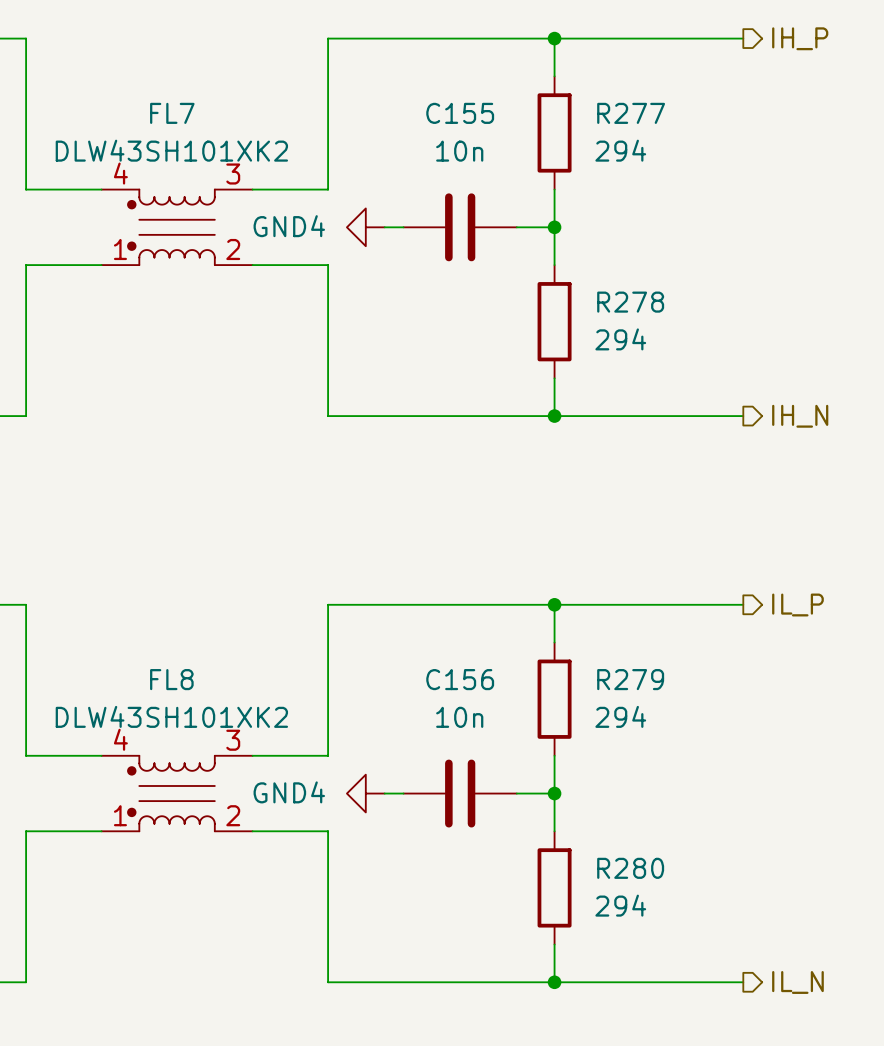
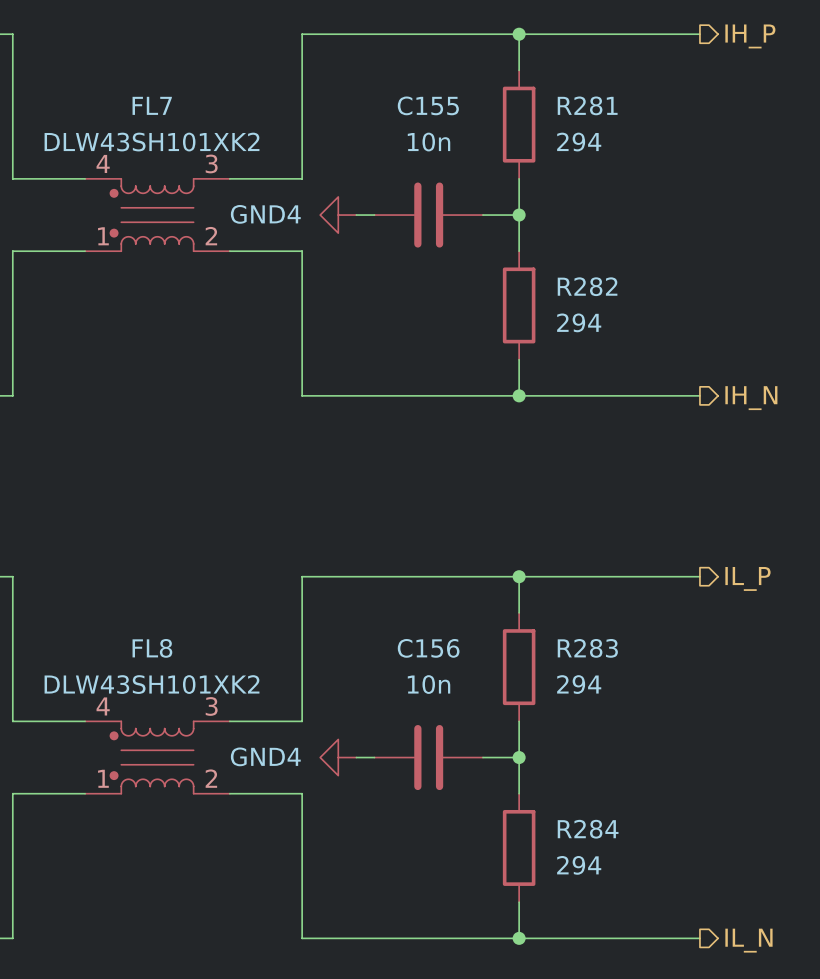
R277 name: R277 (631, 113) -> R281 (587, 105)
R278 name: R278 (630, 302) -> R282 (587, 286)
R279 name: R279 (630, 679) -> R283 (587, 648)
R280 name: R280 (630, 868) -> R284 (588, 829)

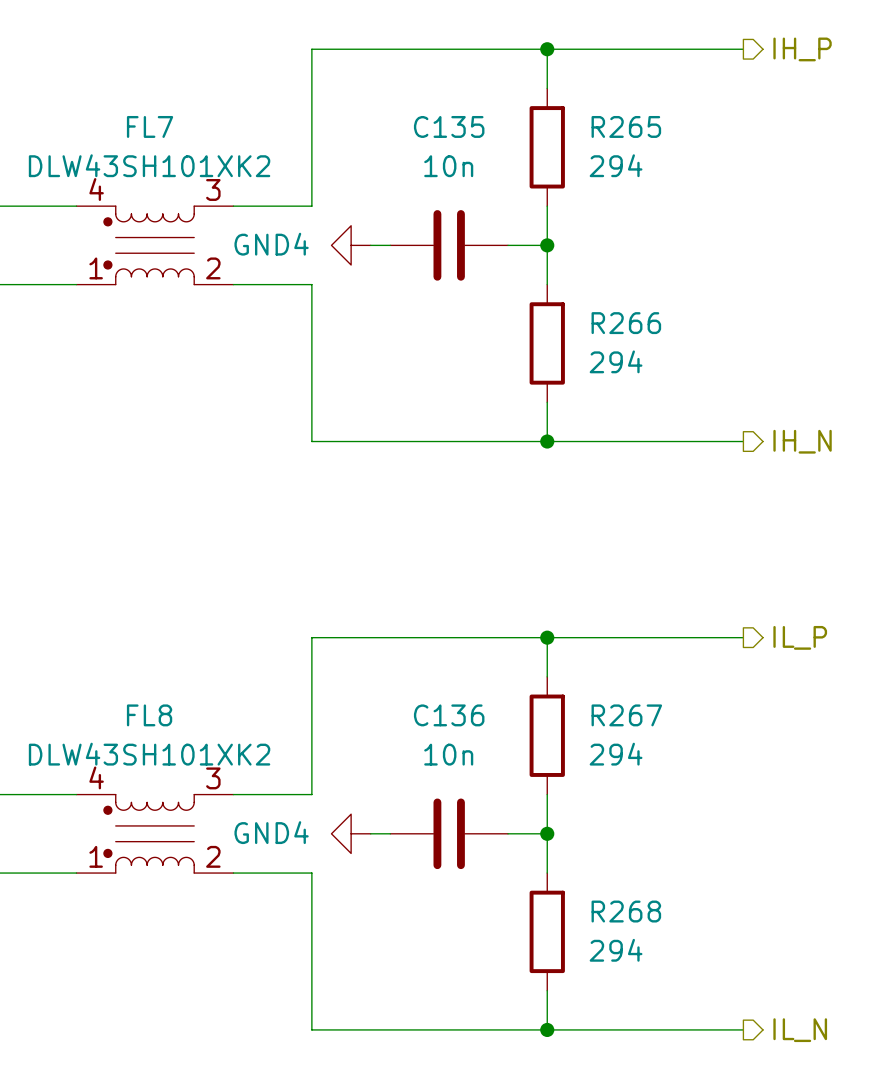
C155 name: C155 (428, 105) -> C135 (449, 126)
R281 name: R281 (587, 105) -> R265 (626, 126)
R282 name: R282 (587, 286) -> R266 (626, 323)
C156 name: C156 (428, 648) -> C136 (449, 715)
R283 name: R283 (587, 648) -> R267 (626, 715)
R284 name: R284 (588, 829) -> R268 (626, 911)

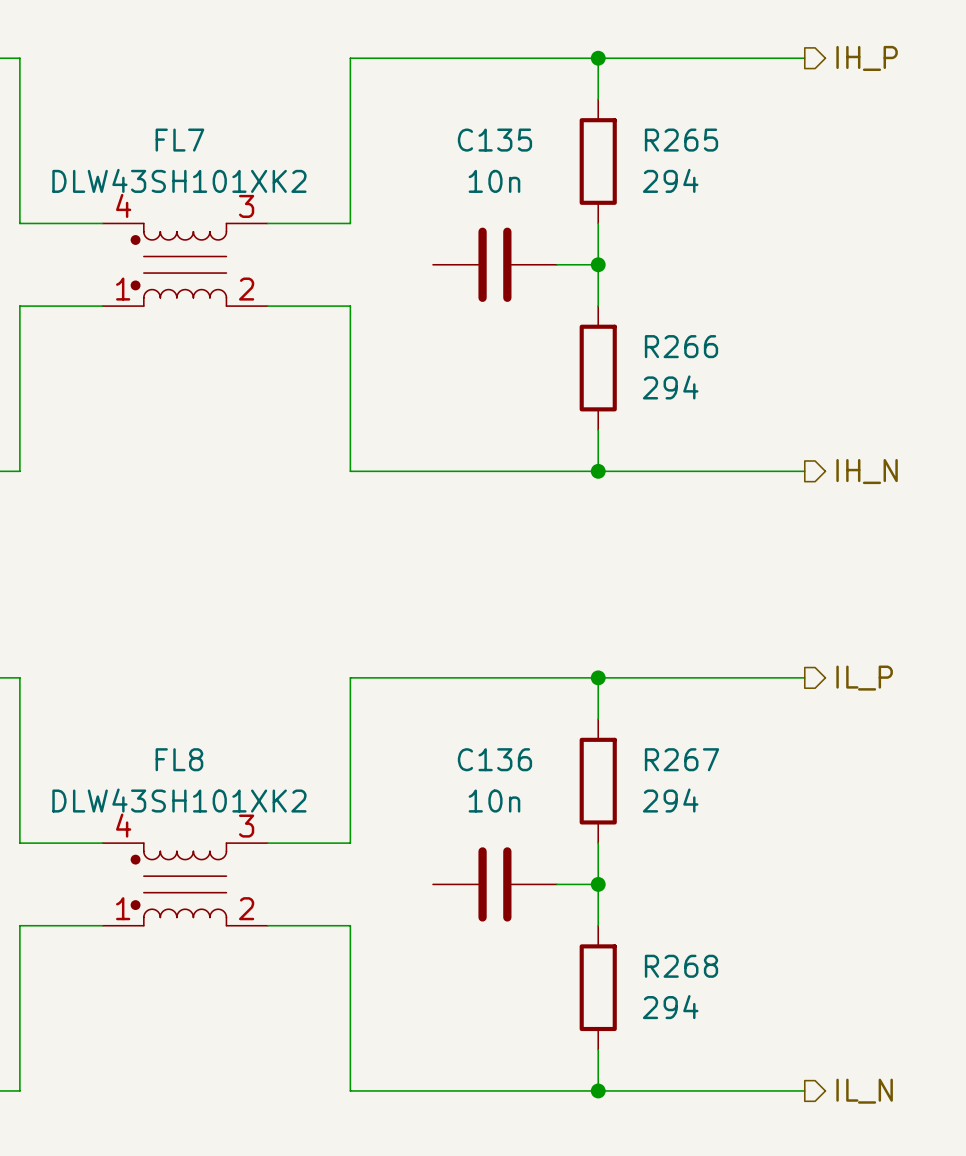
power symbol: GND4 (351, 245) -> none
wire: (370, 245) (390, 245) -> none
power symbol: GND4 (351, 833) -> none
wire: (370, 833) (390, 833) -> none

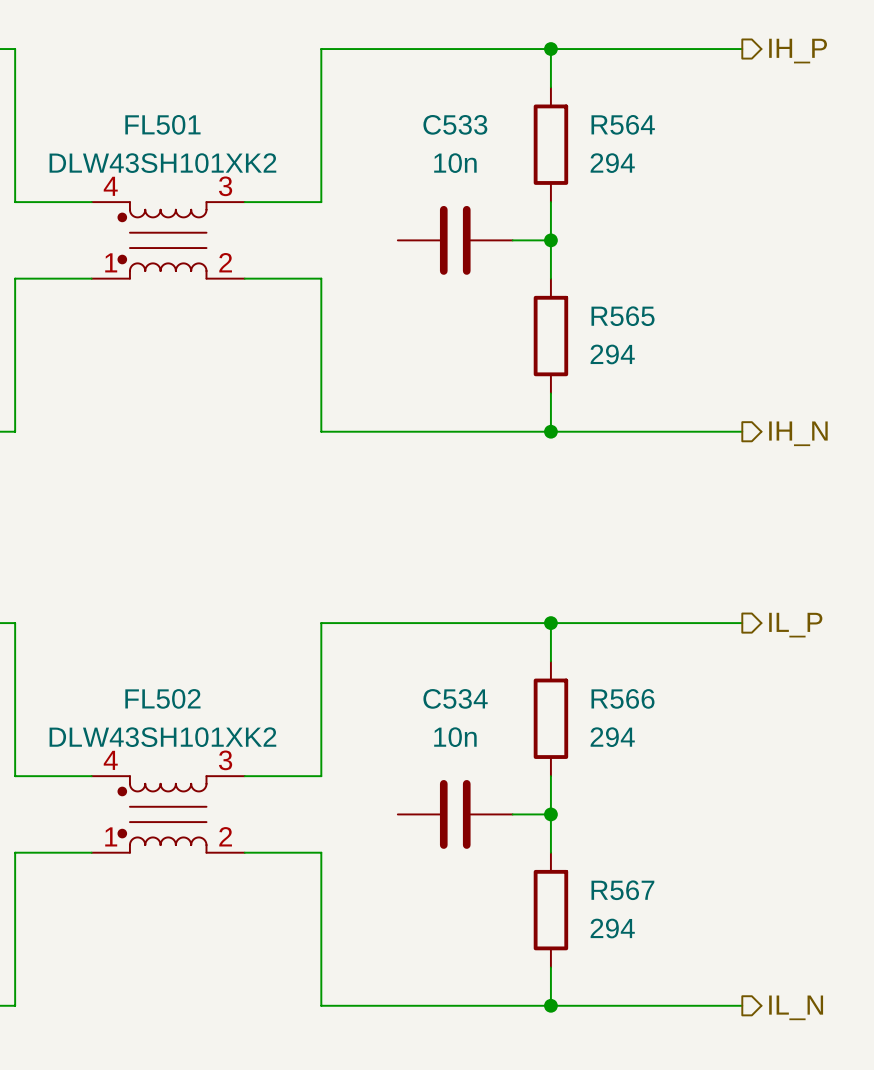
FL7 name: FL7 (179, 140) -> FL501 (162, 124)
C135 name: C135 (494, 140) -> C533 (455, 124)
R265 name: R265 (681, 140) -> R564 (623, 124)
R266 name: R266 (681, 346) -> R565 (623, 316)
FL8 name: FL8 (179, 759) -> FL502 (162, 698)
C136 name: C136 (494, 759) -> C534 (455, 698)
R267 name: R267 (681, 759) -> R566 (622, 698)
R268 name: R268 (681, 966) -> R567 (622, 890)

